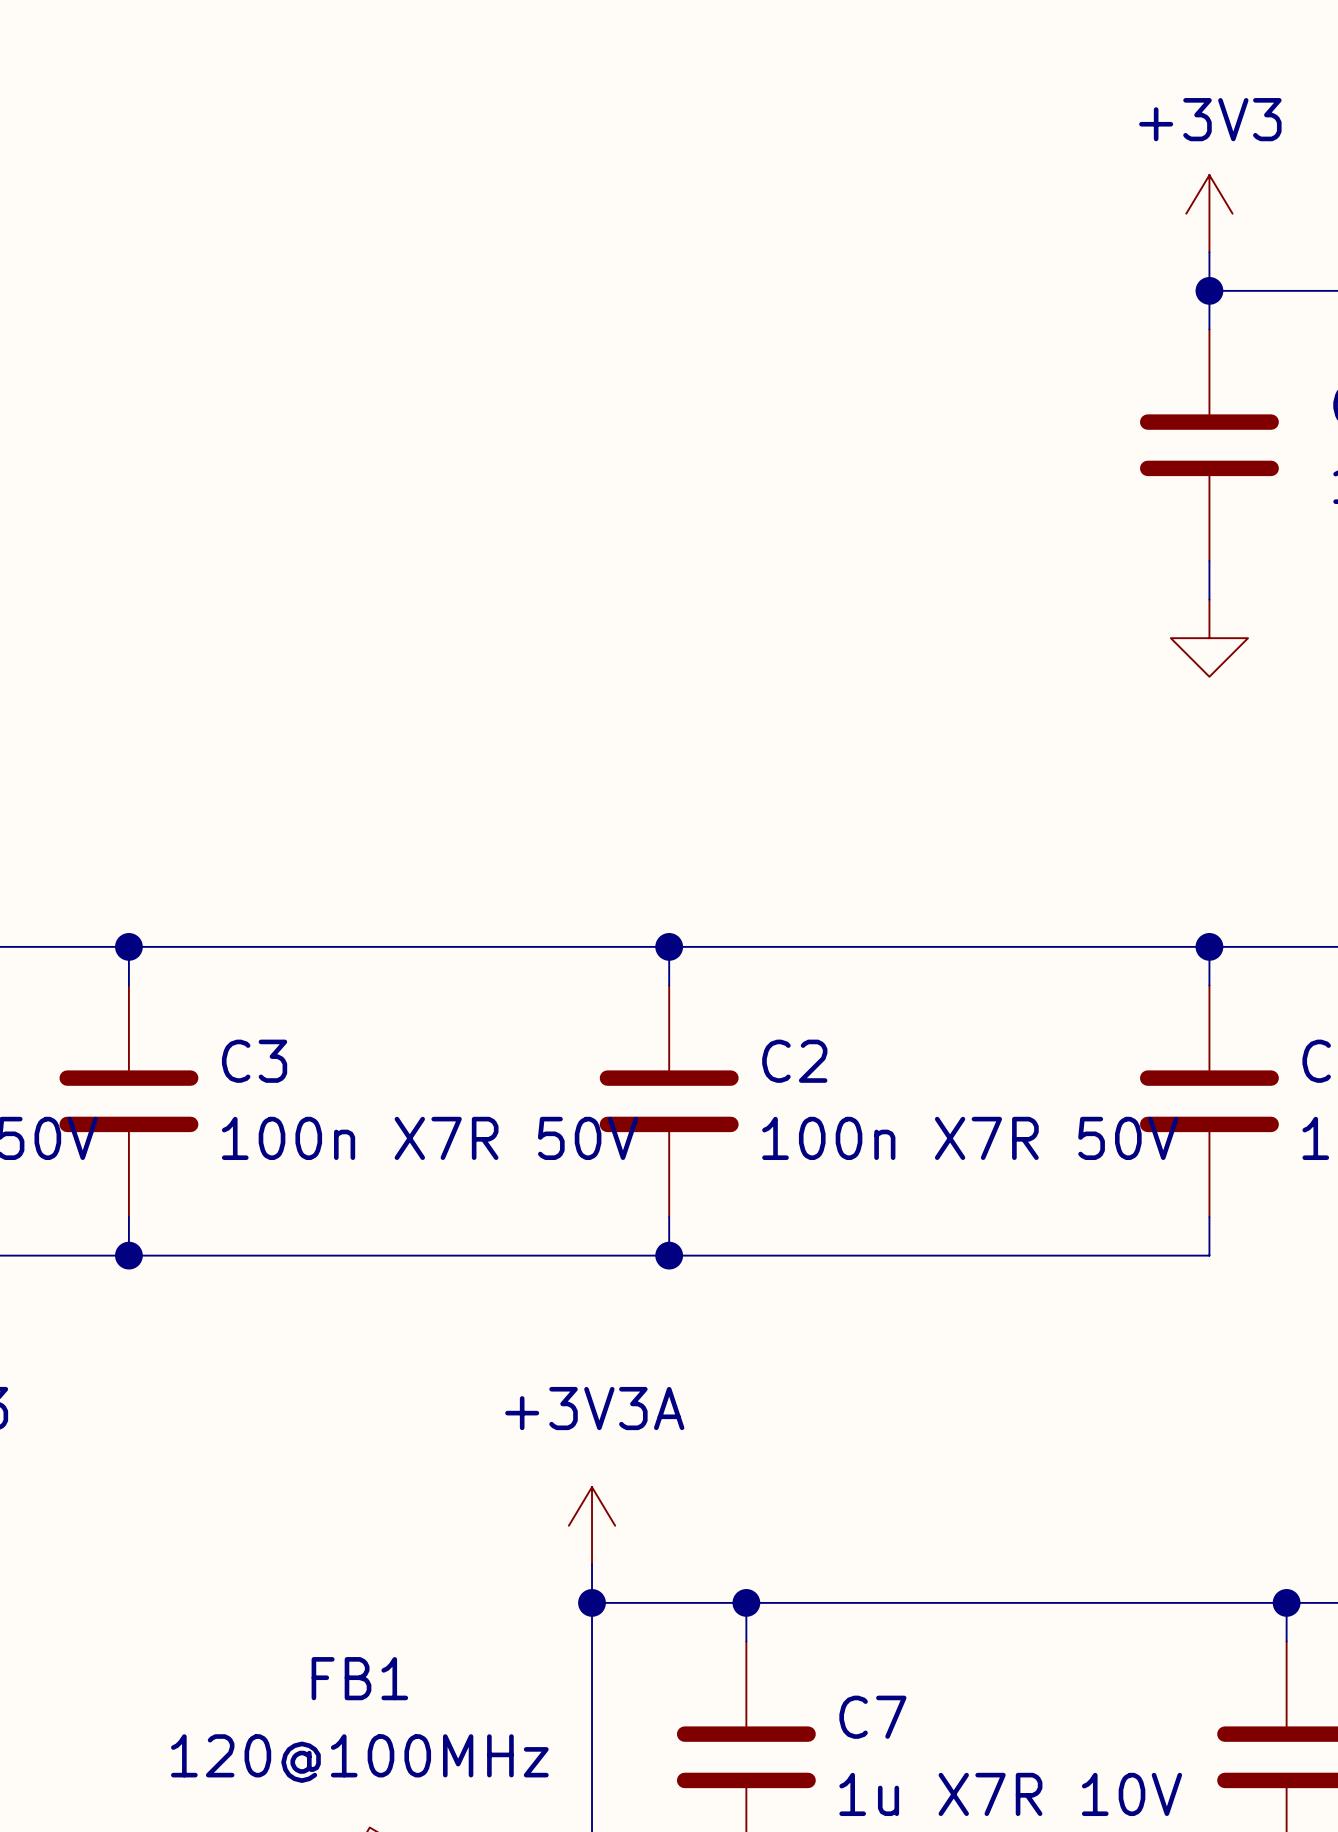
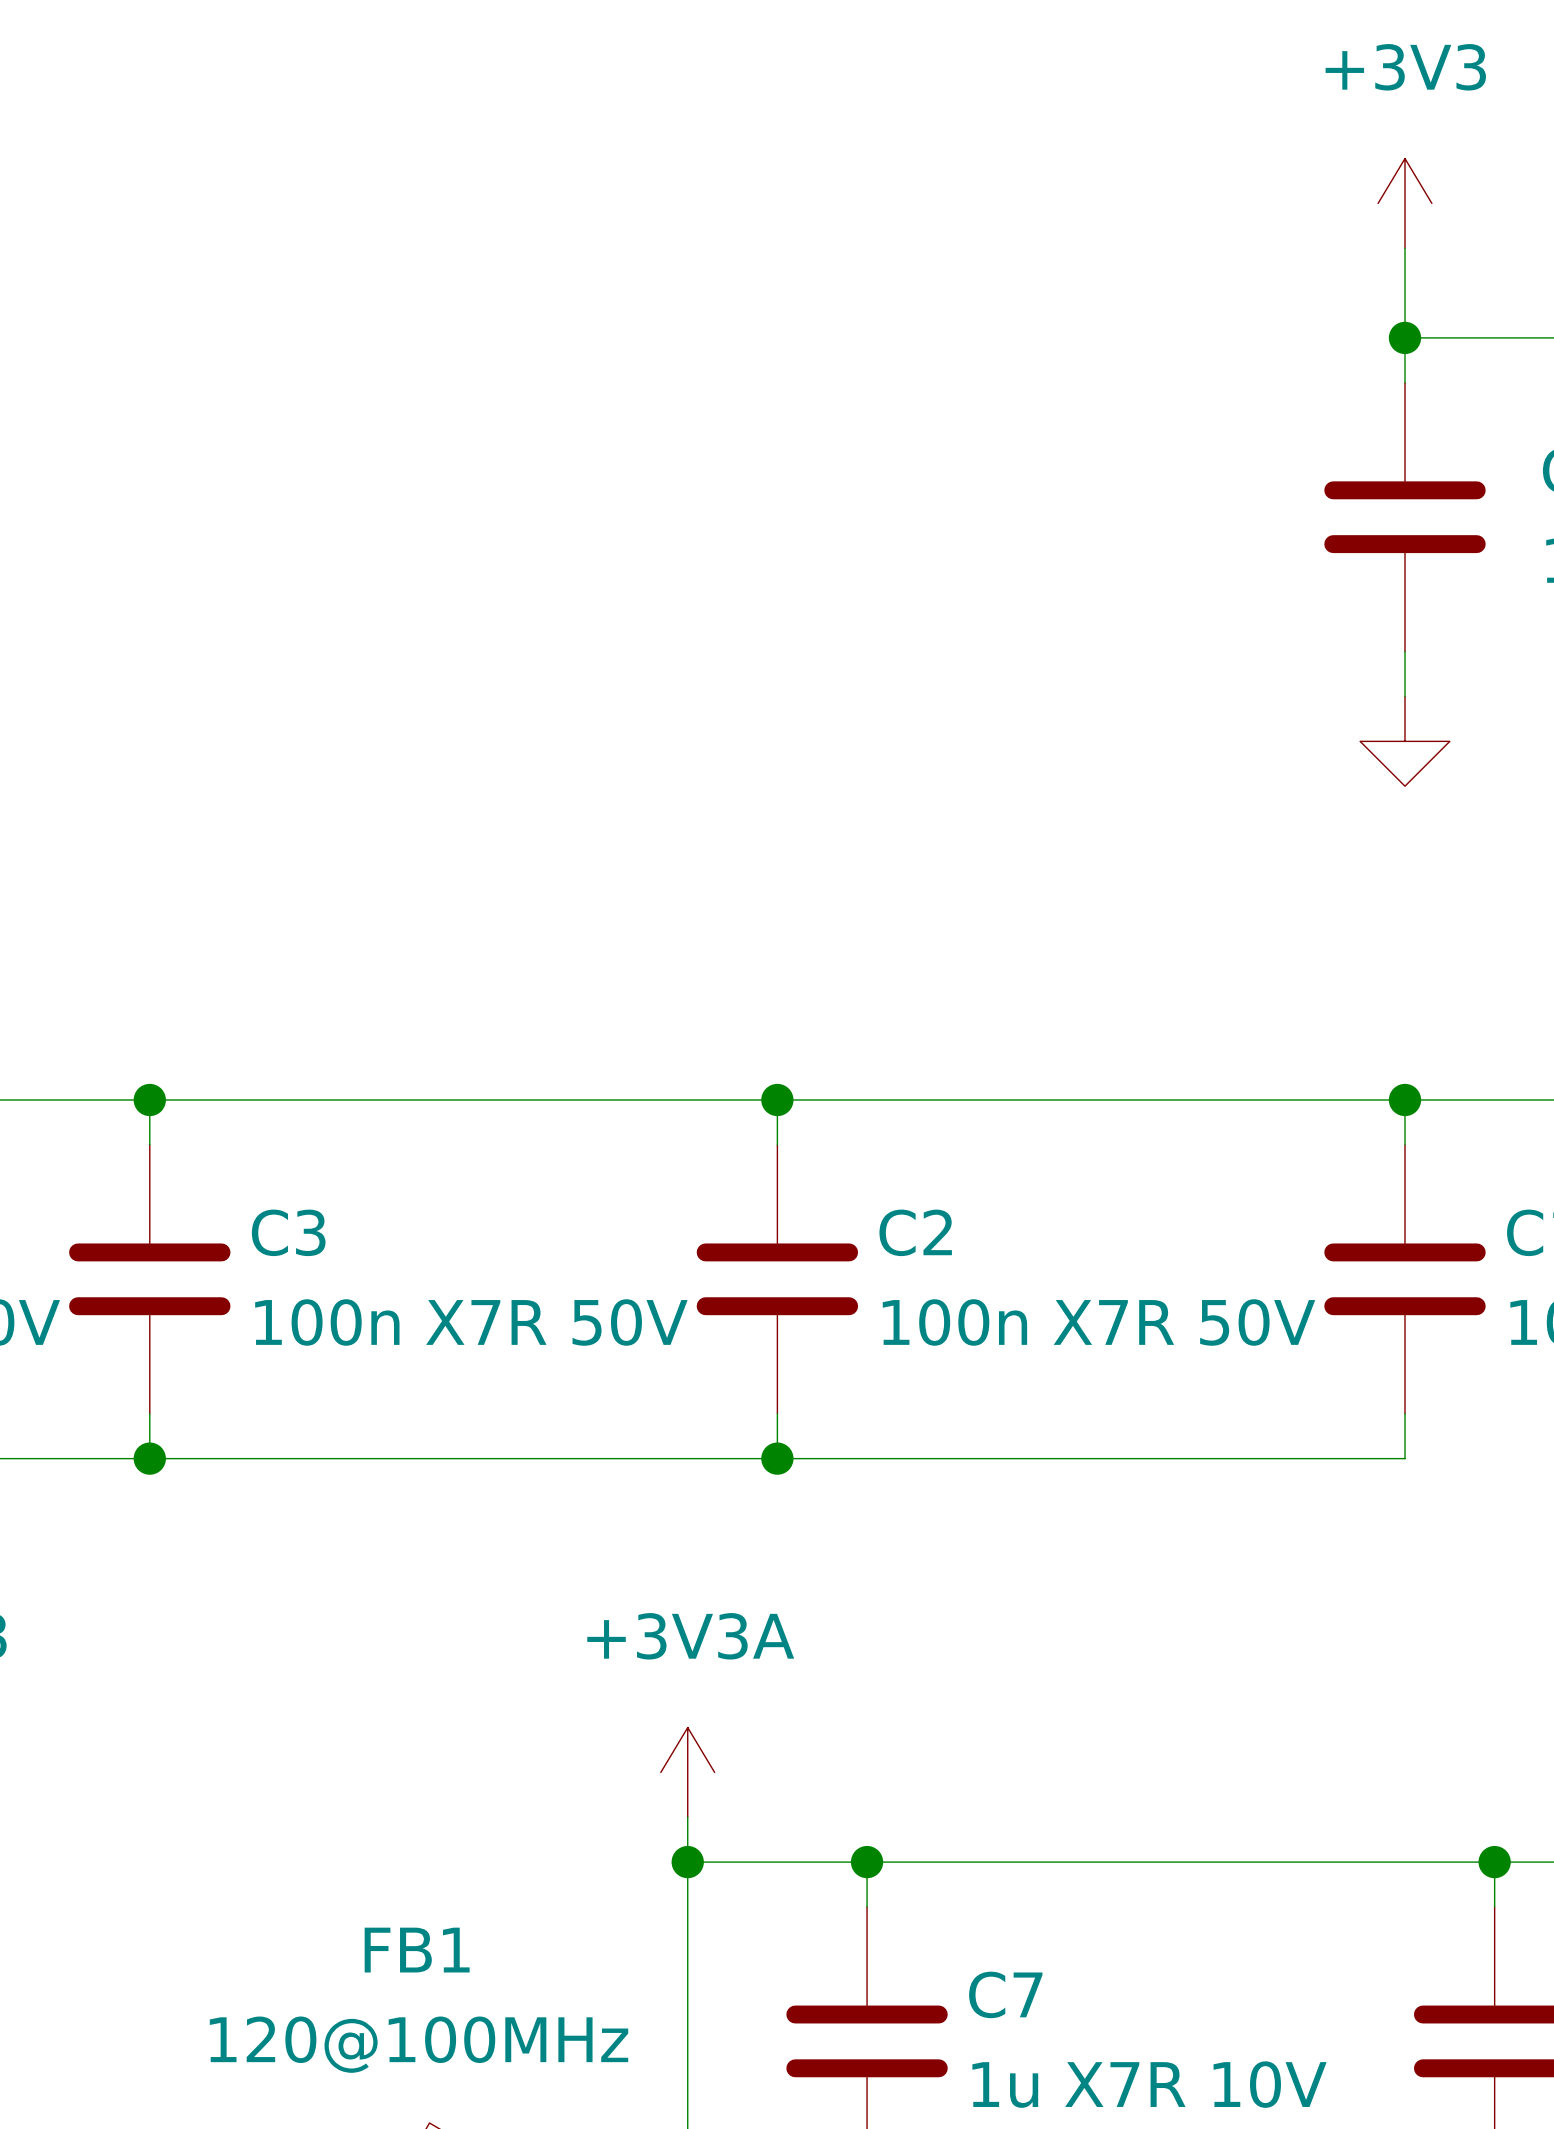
power symbol text position: +3V3 (1210, 119) -> +3V3 (1405, 67)
power symbol position: +3V3 (1209, 213) -> +3V3 (1404, 203)

